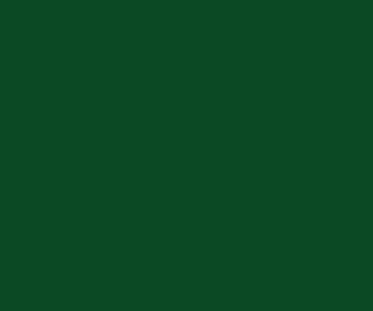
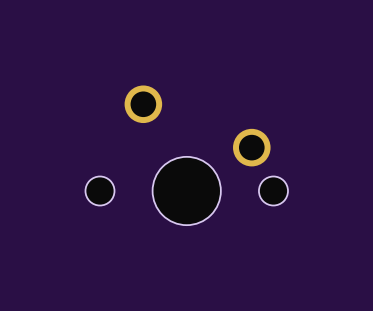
part: none -> (186, 155)

